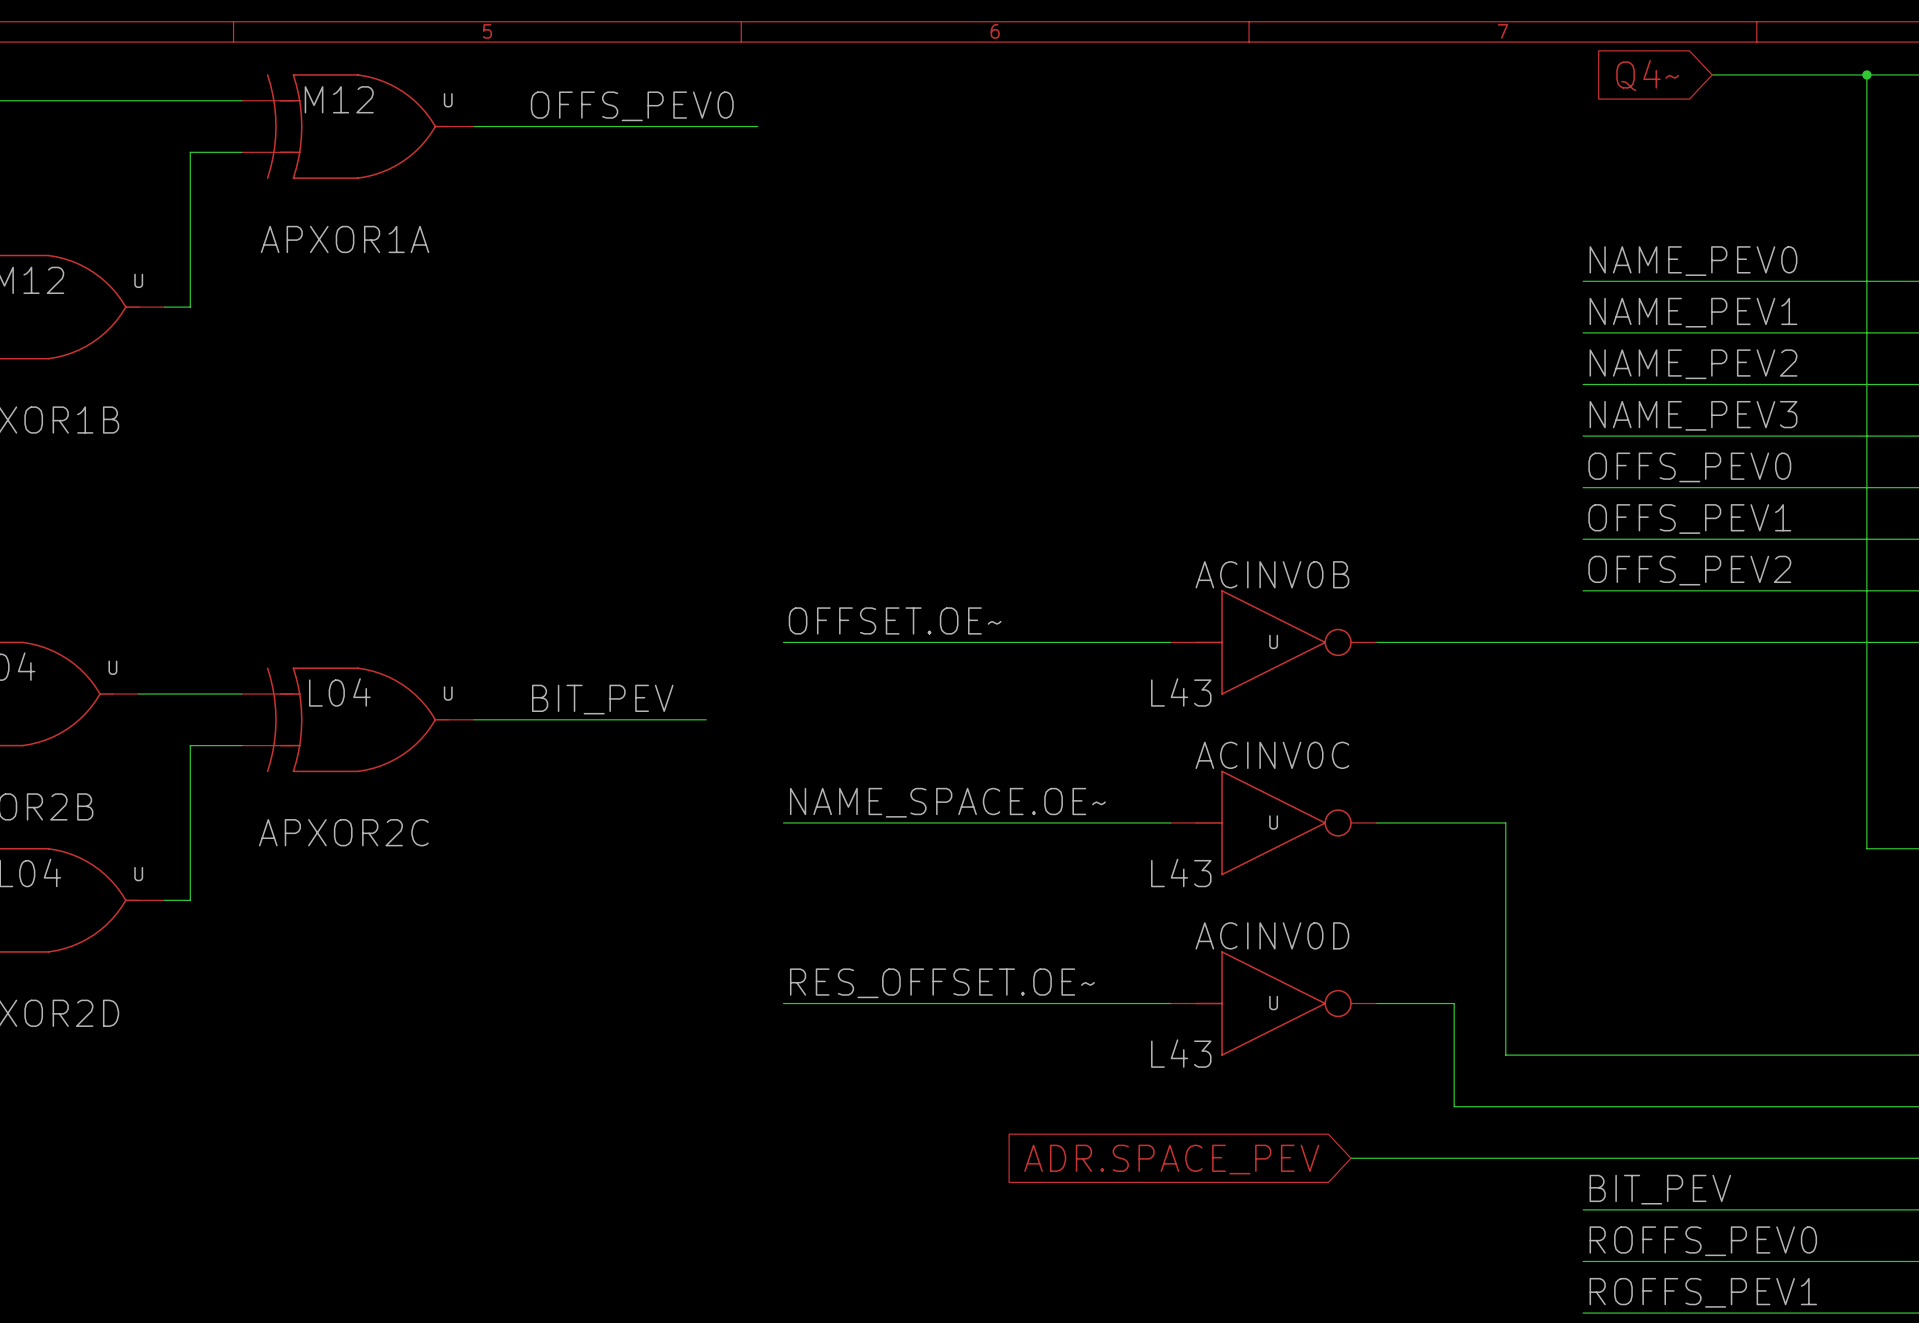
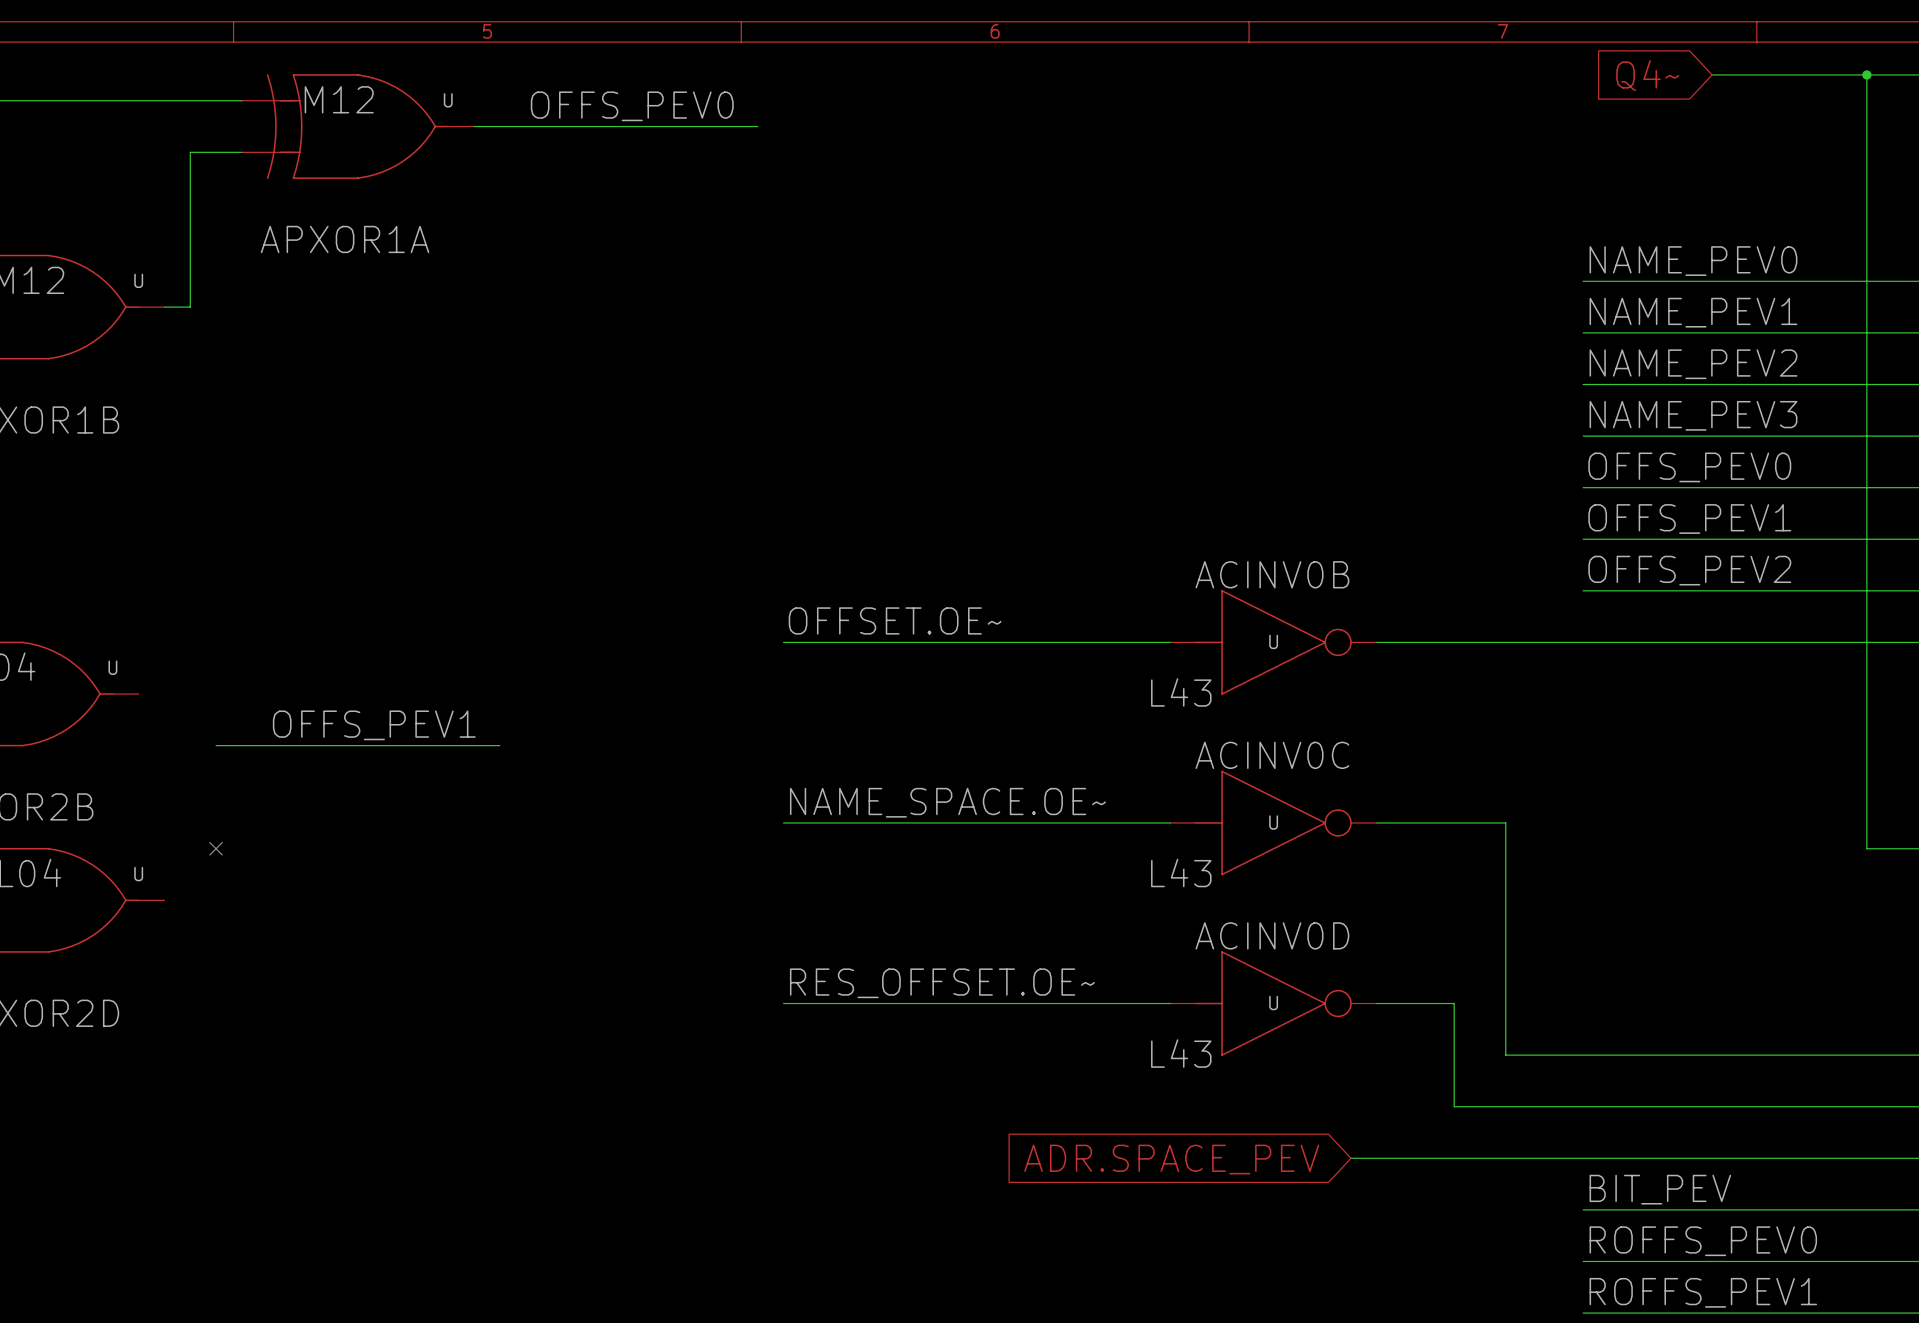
wire: (138, 694) (241, 694) -> none
label: BIT_PEV (602, 699) -> none
U: (357, 719) -> none
wire: (474, 719) (706, 719) -> none
label: none -> OFFS_PEV1 (374, 725)
wire: (216, 745) (190, 745) (190, 900) (164, 900) -> none
wire: none -> (241, 745) (499, 745)
no-connect mark: none -> (216, 848)

